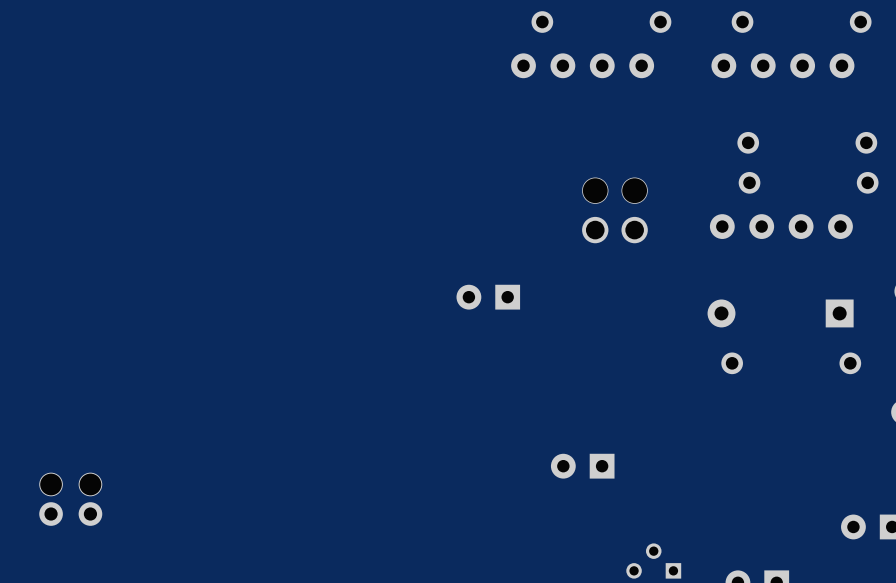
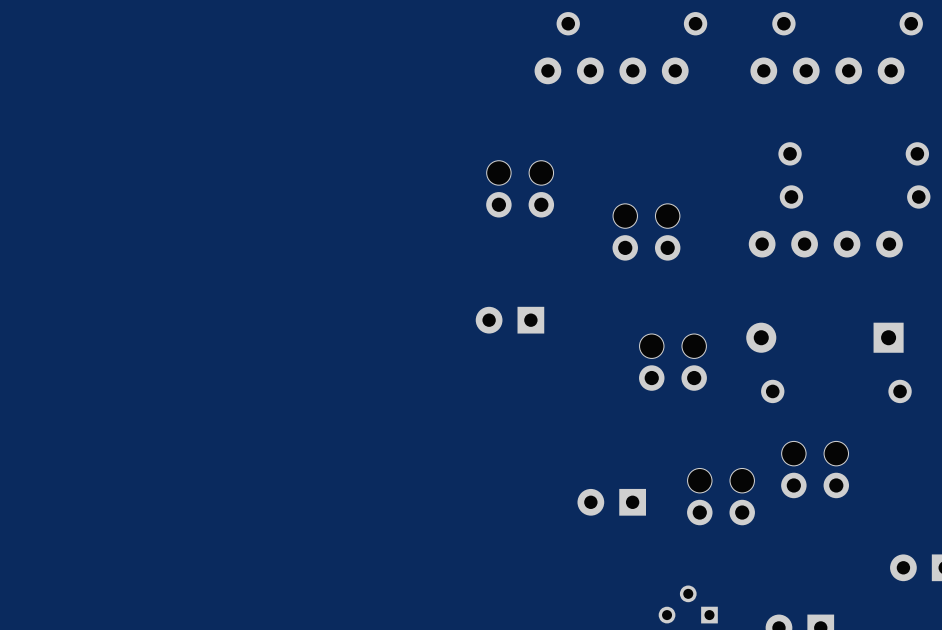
part: none -> (520, 188)
part footprint: [582, 177, 648, 244] -> [612, 203, 681, 261]
part: none -> (672, 362)
part: none -> (815, 469)
part: none -> (721, 496)
part: (70, 499) -> none

